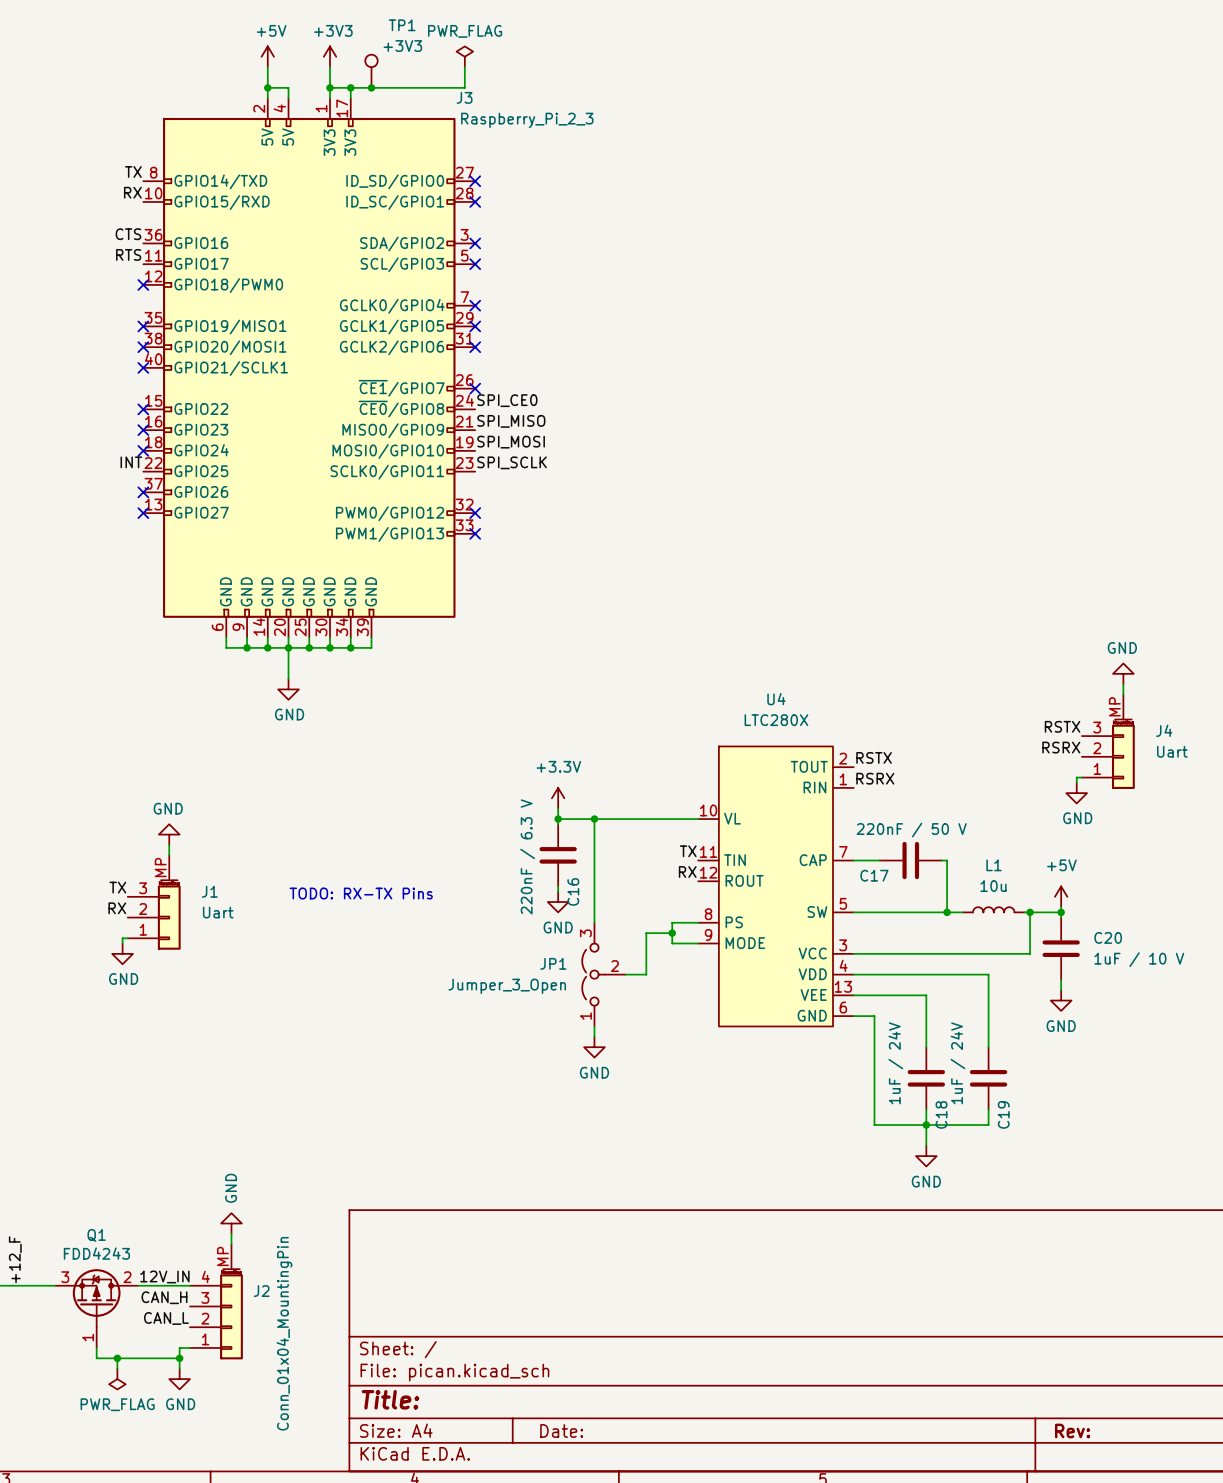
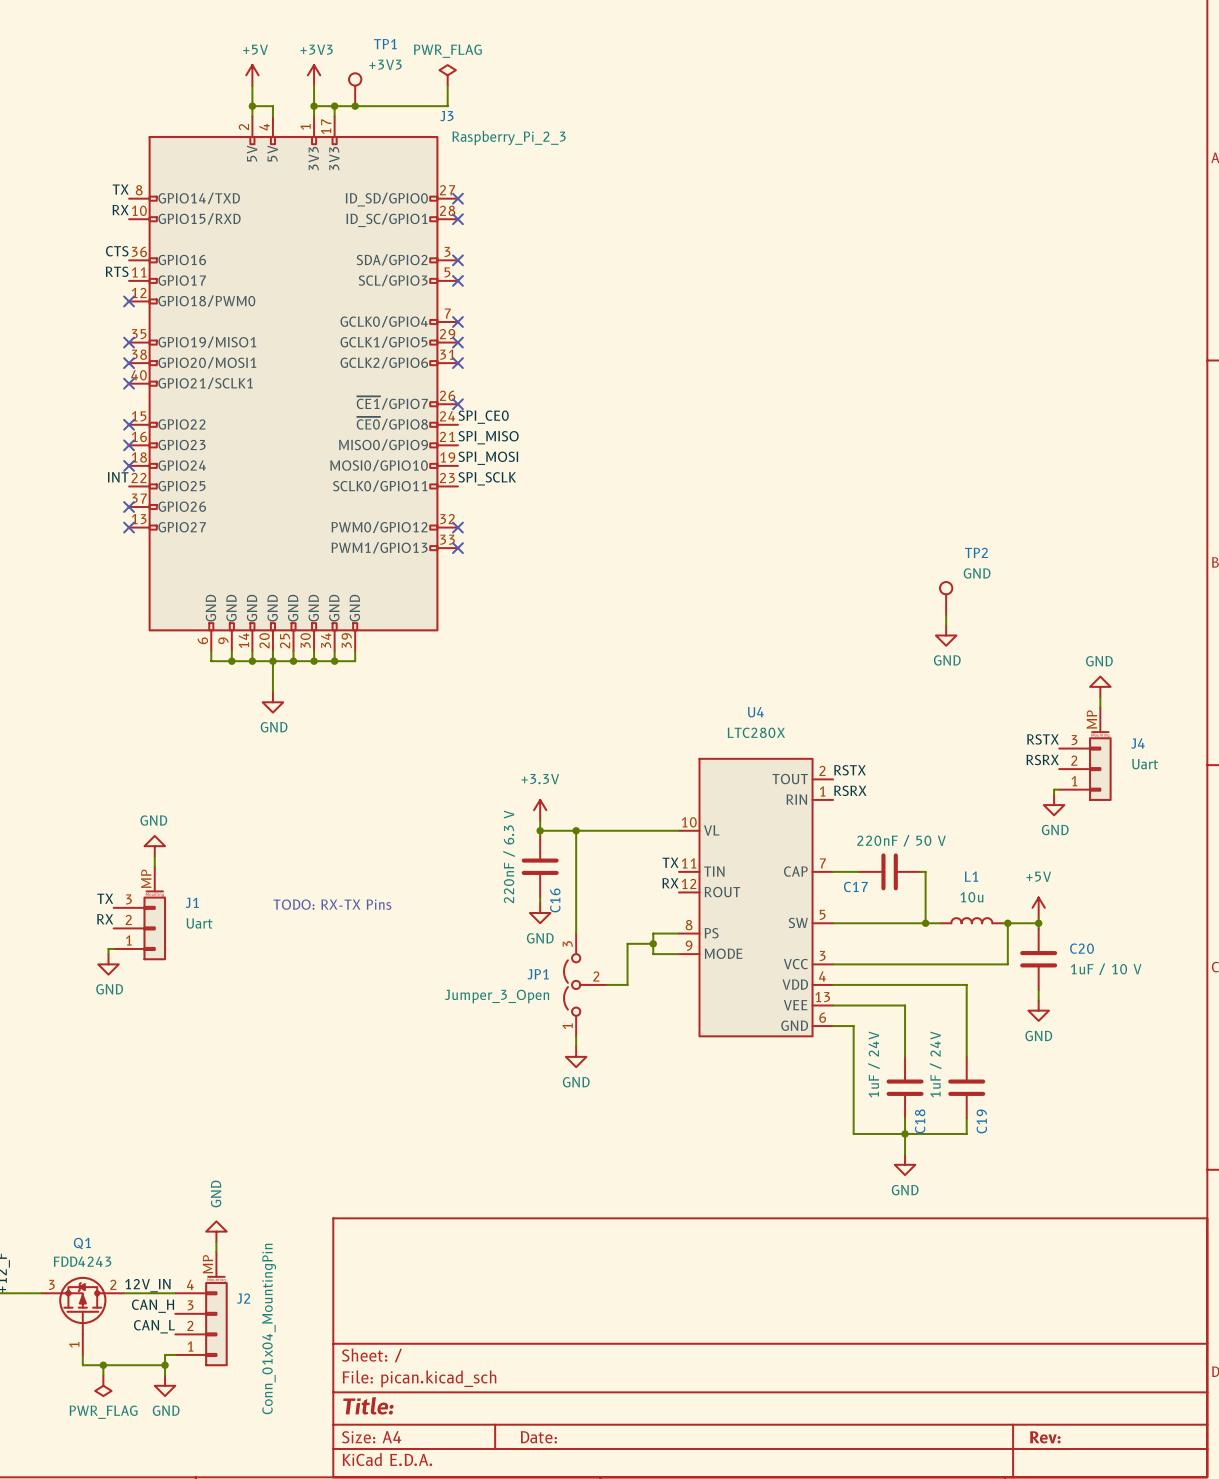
TP2: none -> GND (946, 598)
wire: none -> (946, 614) (946, 625)
power symbol: none -> GND (946, 635)

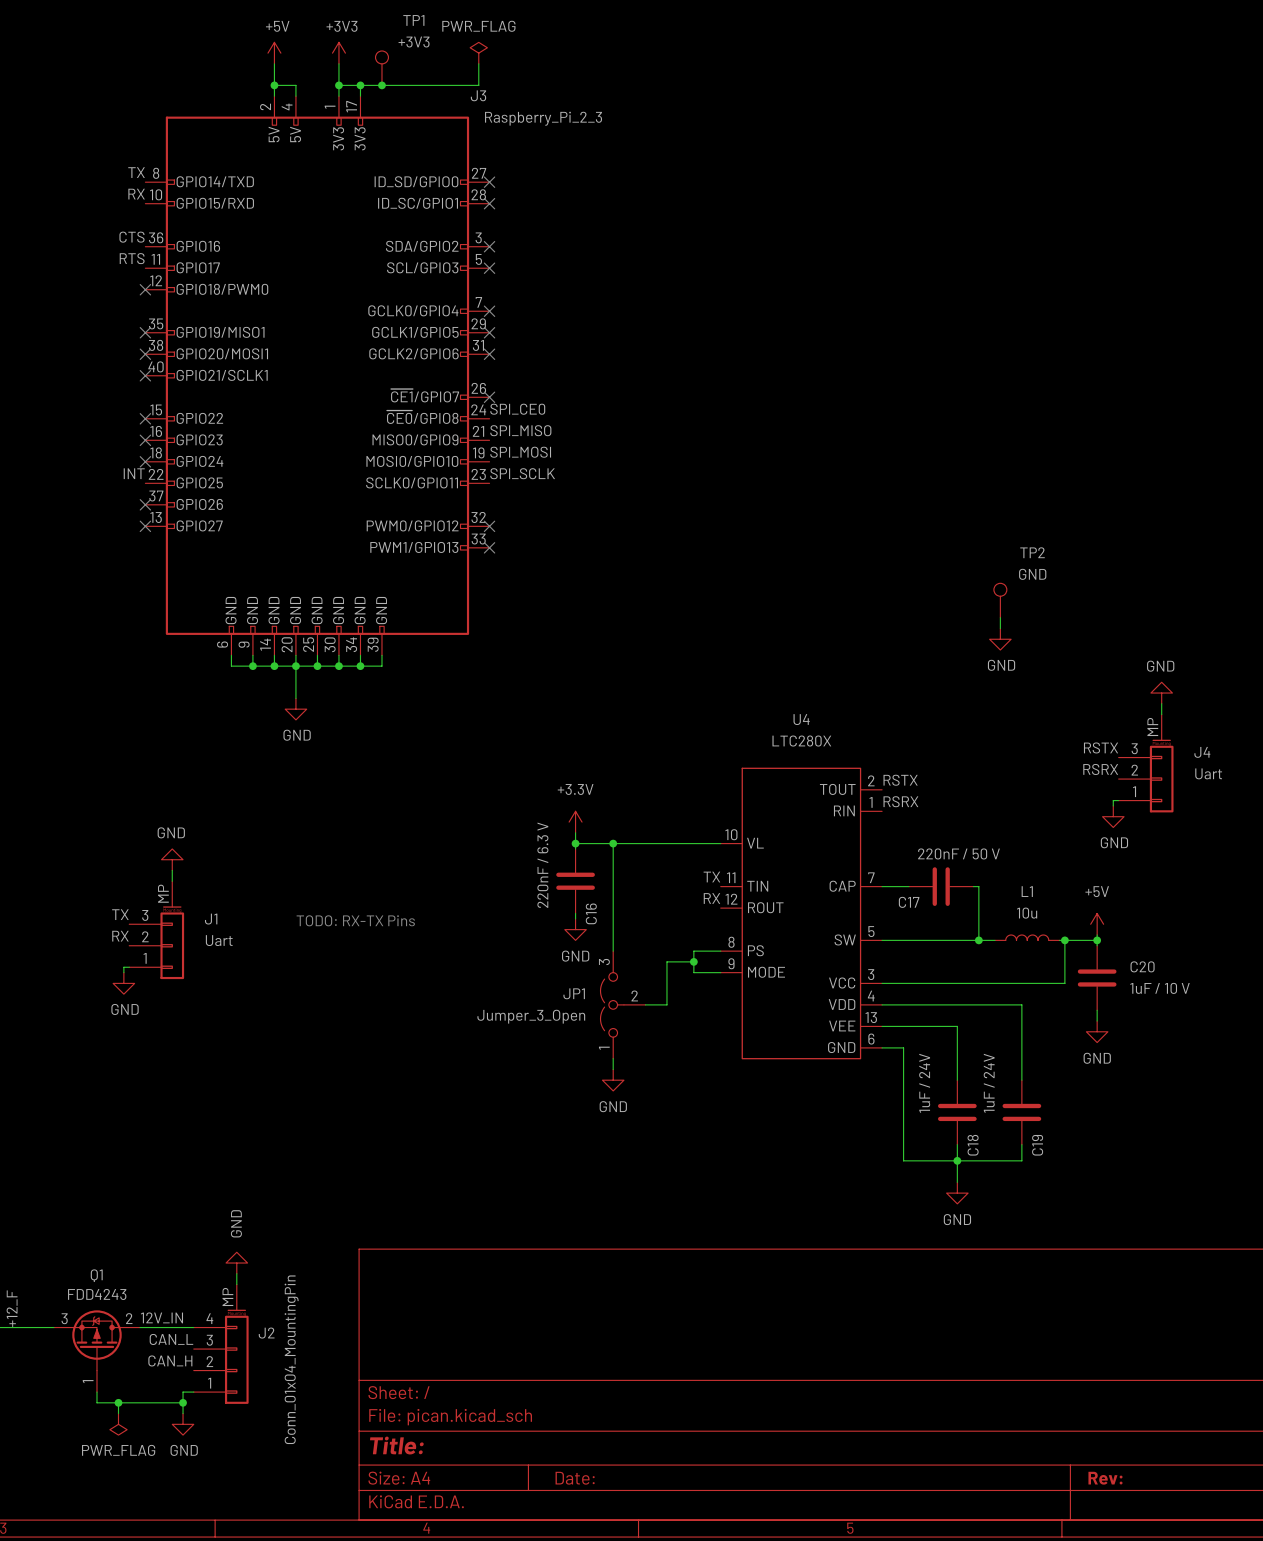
label: CAN_H (153, 1306) -> CAN_L (171, 1339)
label: CAN_L (154, 1326) -> CAN_H (170, 1360)

